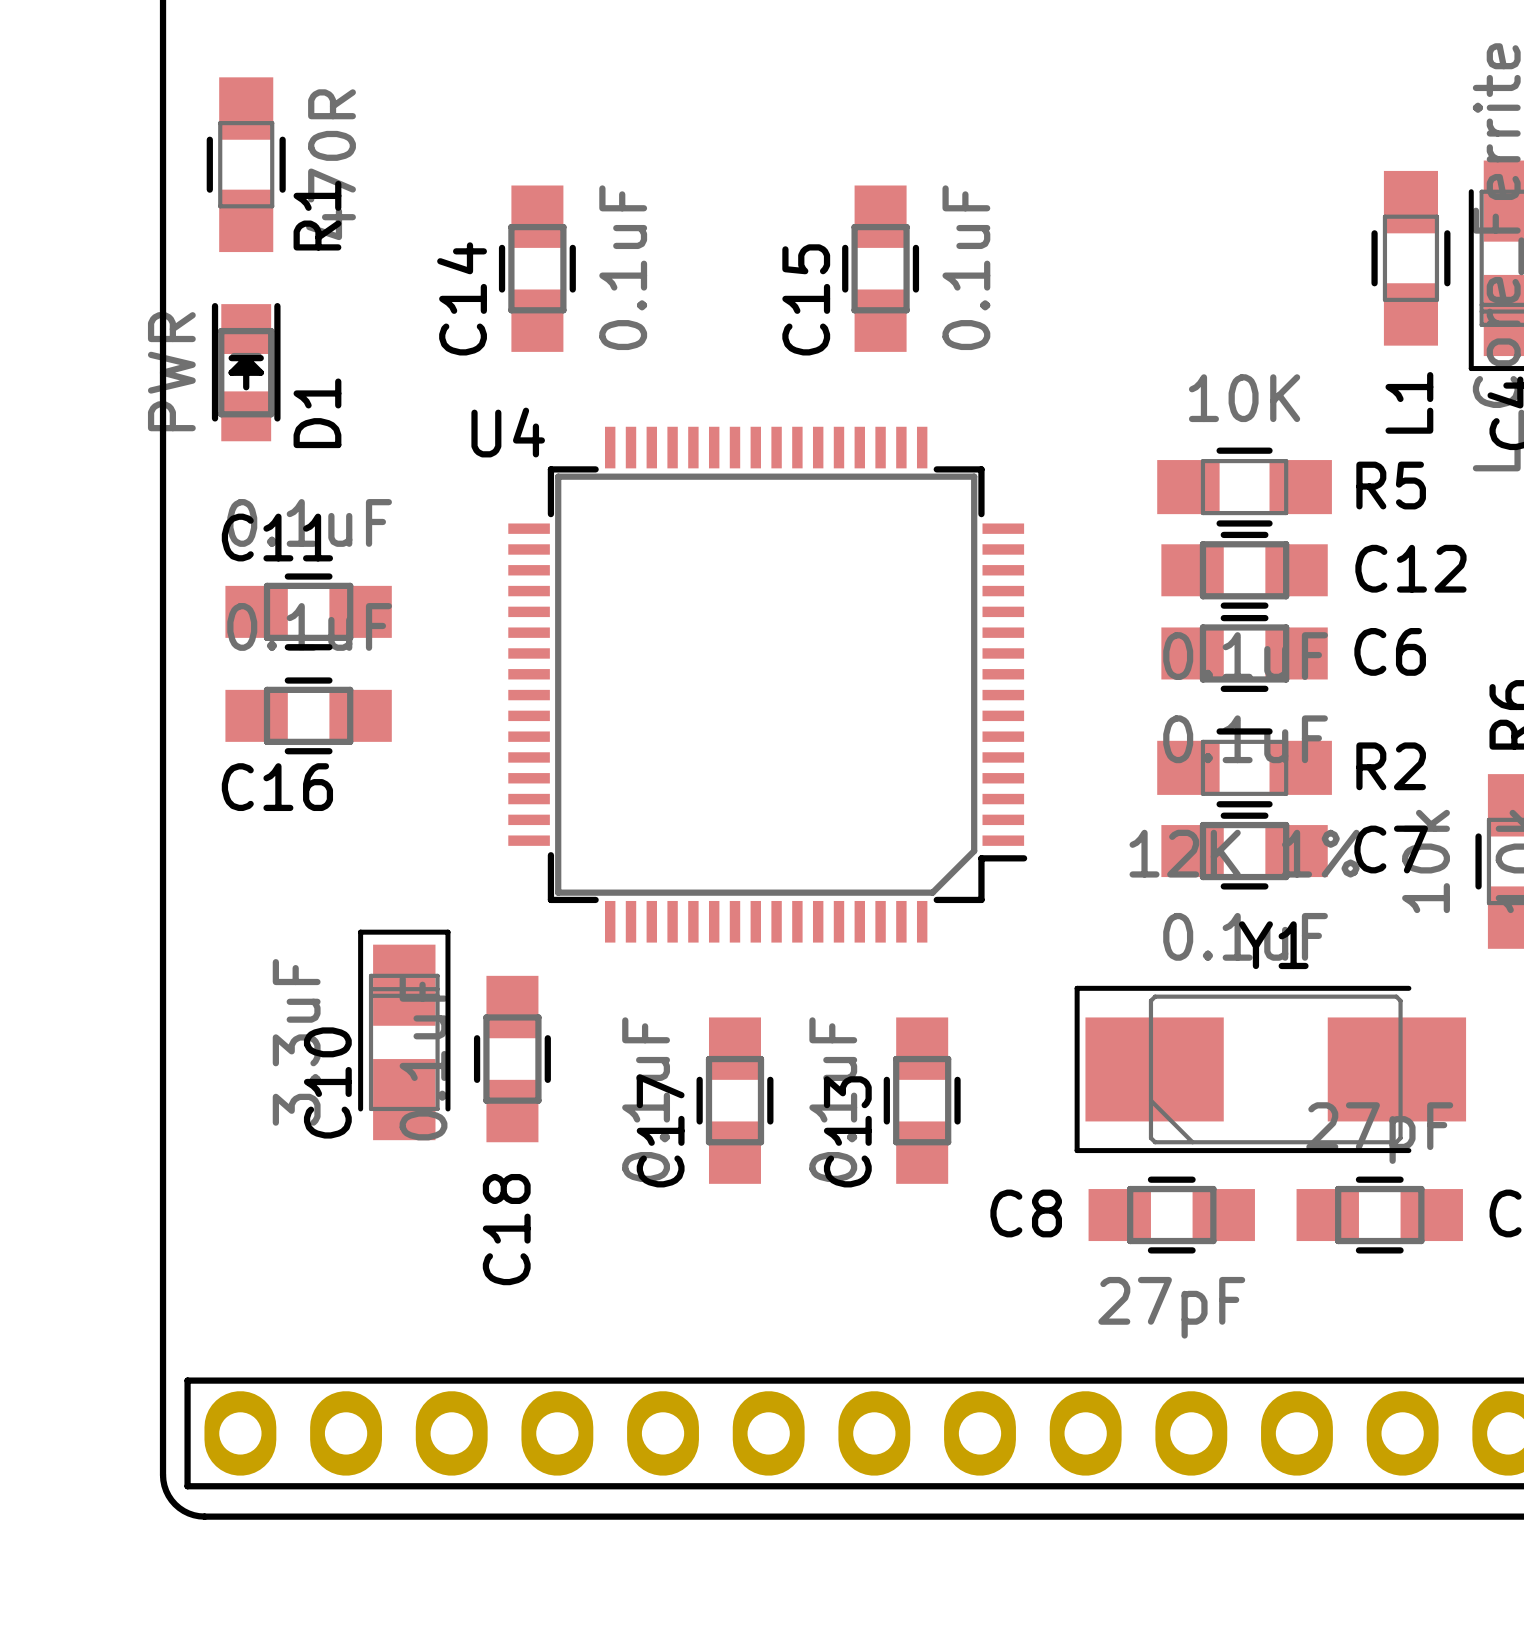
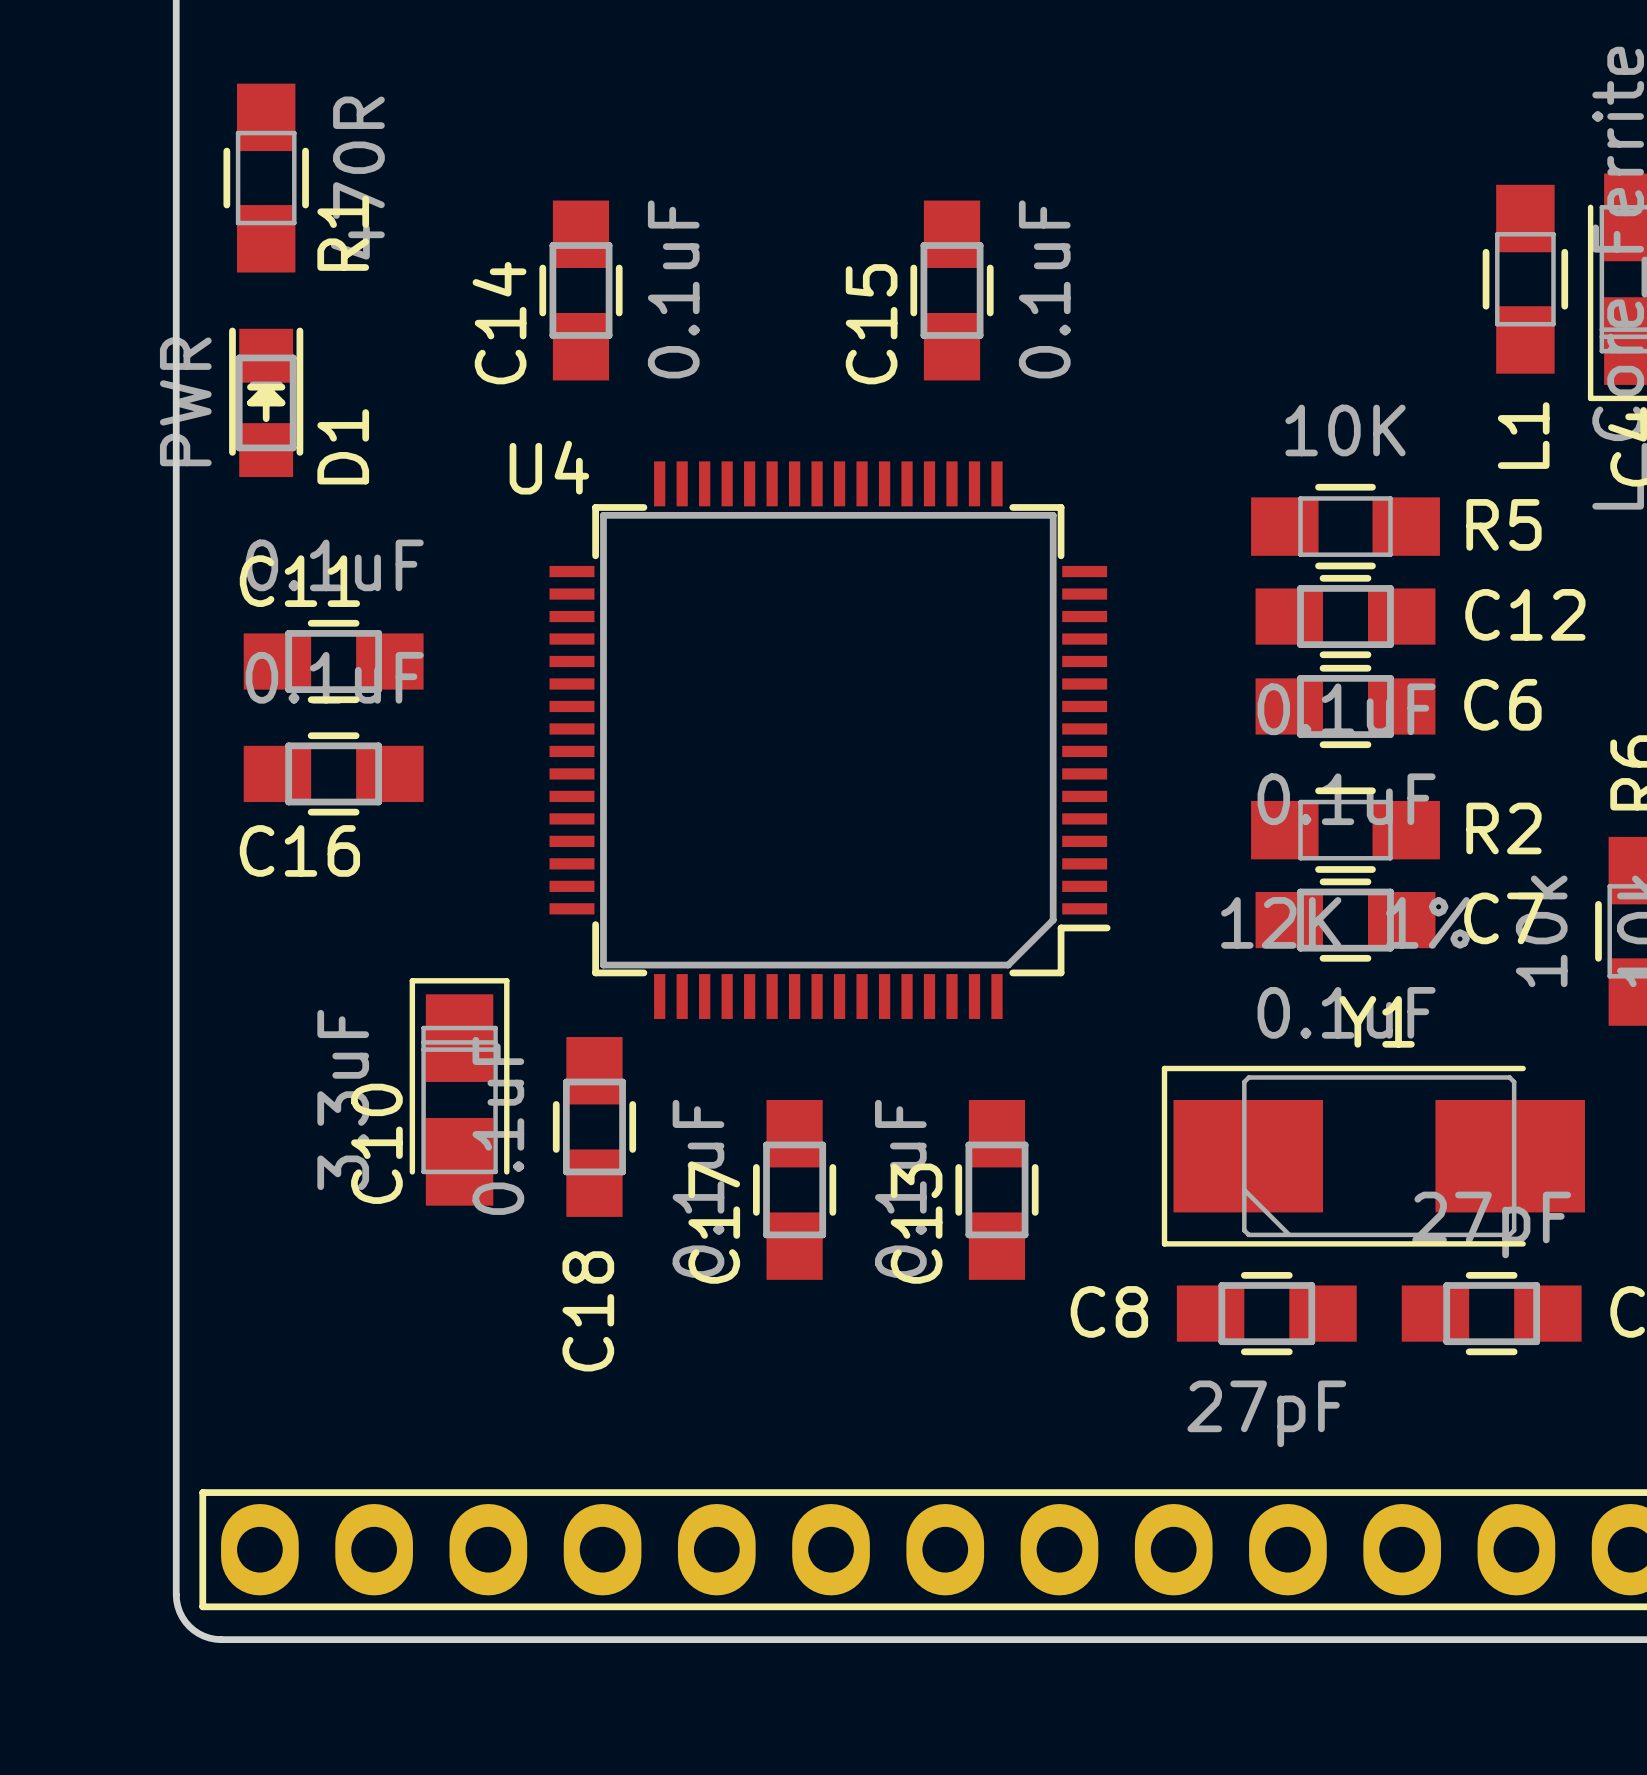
C10 position: (404, 1034) -> (459, 1091)
C18 position: (512, 1059) -> (594, 1126)

